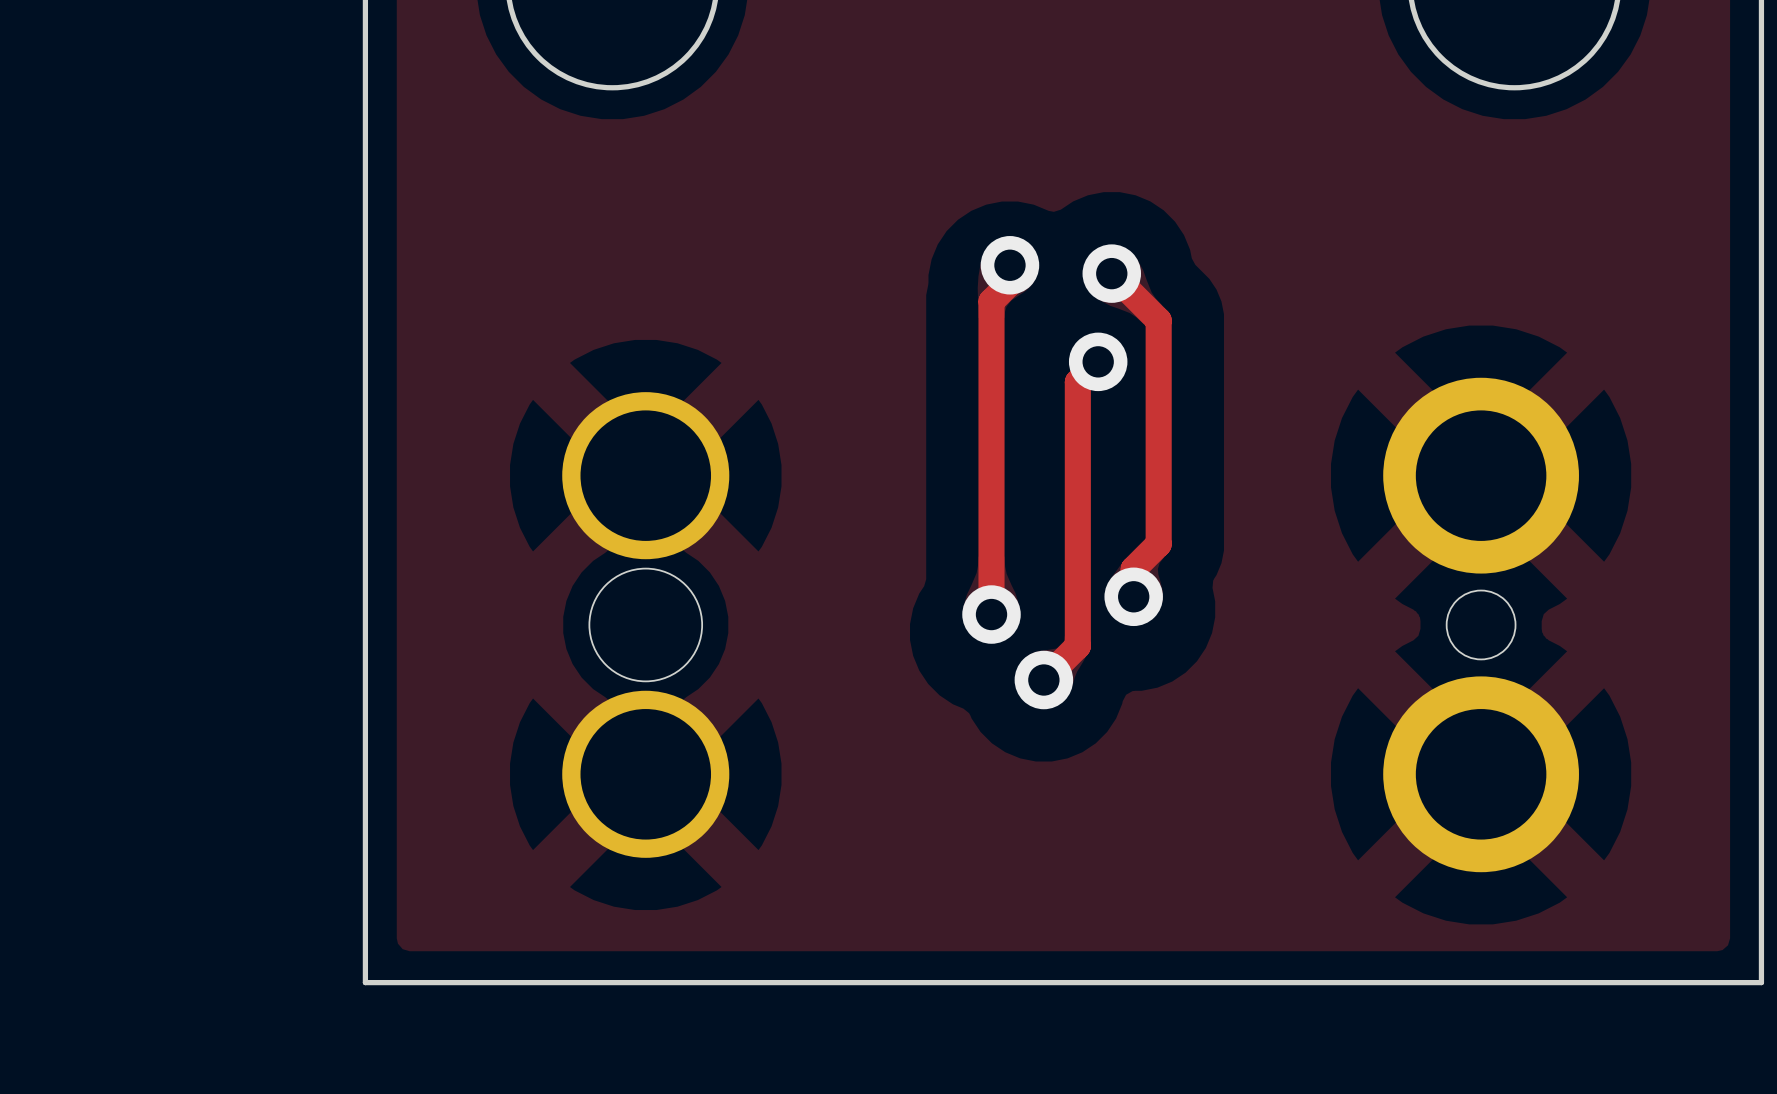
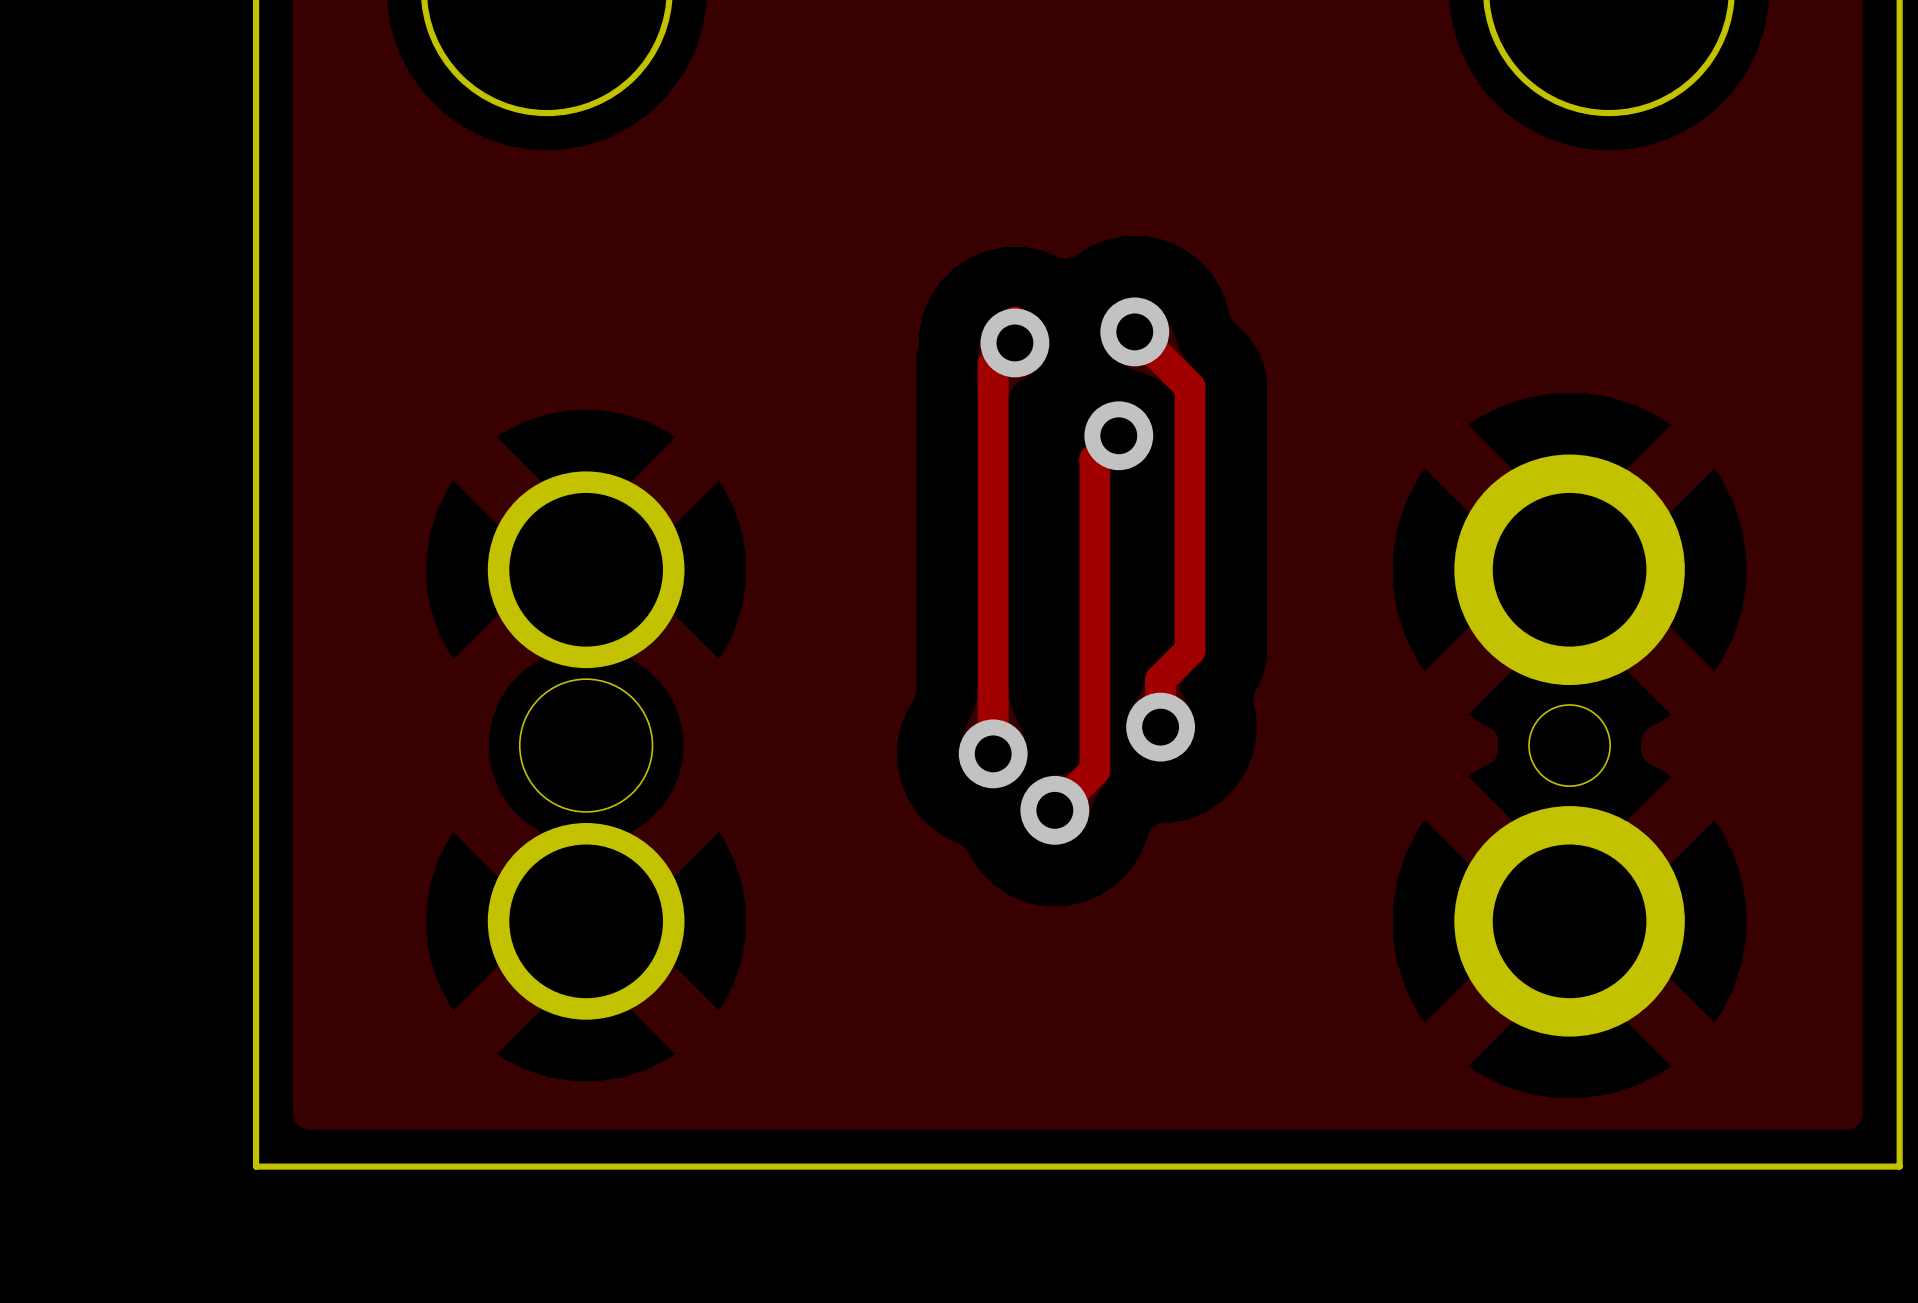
via position: (1009, 265) -> (1014, 342)
via position: (1133, 596) -> (1160, 727)
via position: (991, 614) -> (993, 753)

